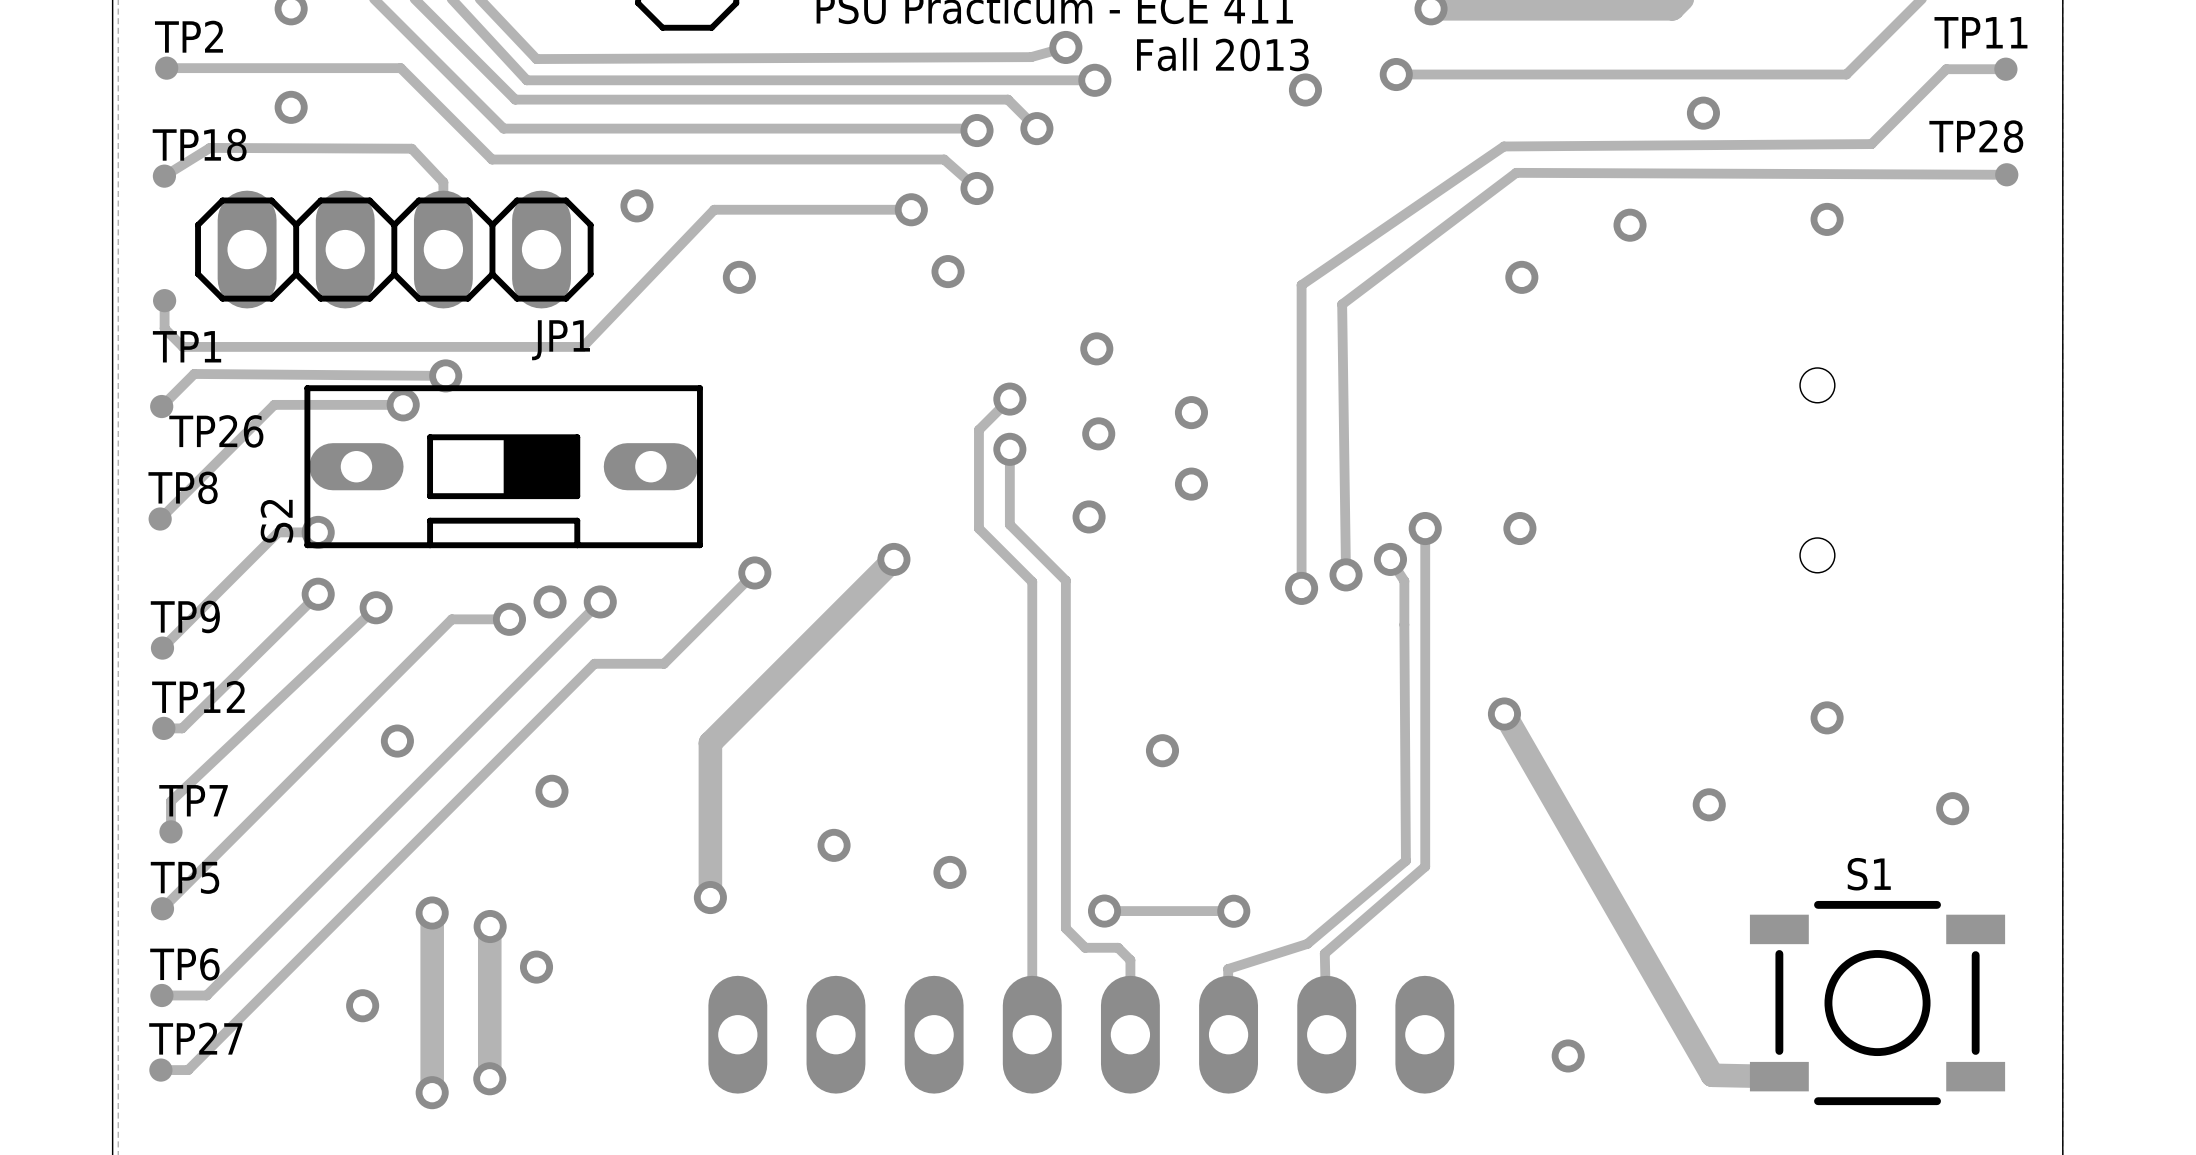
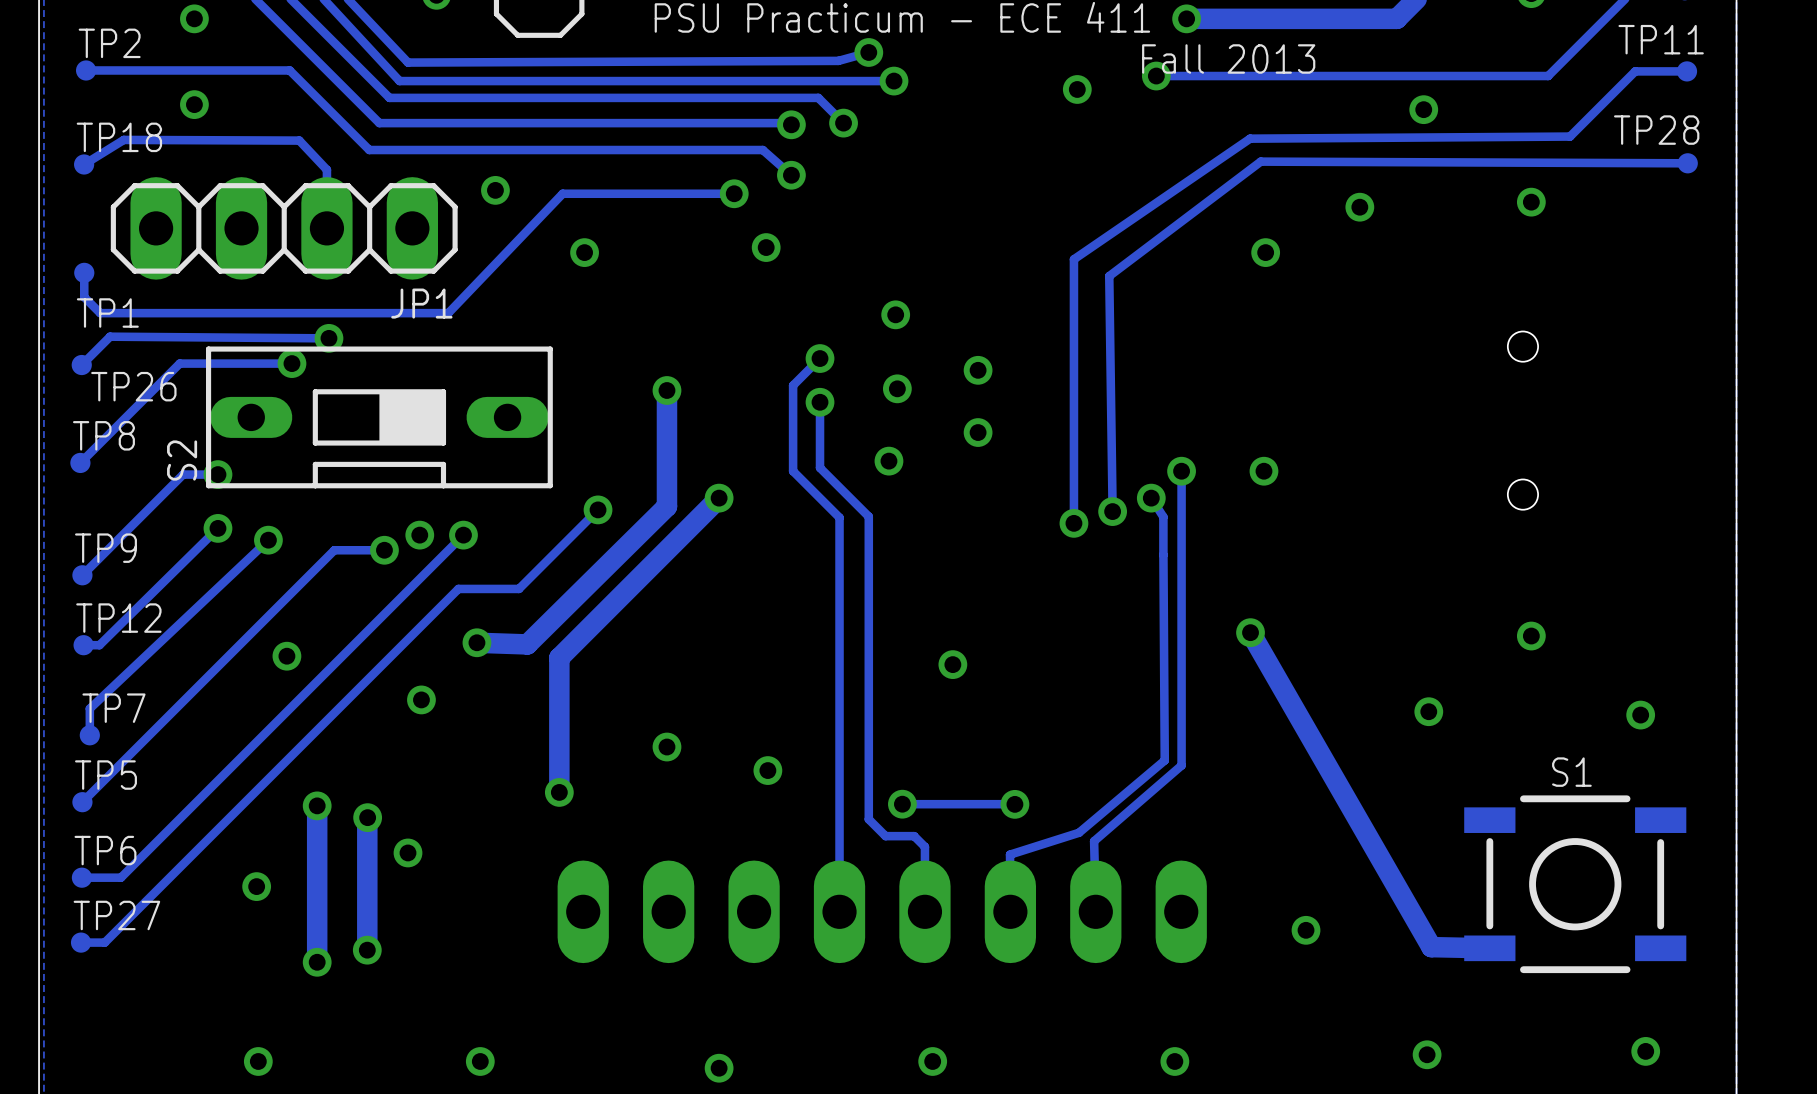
track: none -> (666, 390) (666, 506) (527, 644) (476, 642)
via: none -> (666, 390)
via: none -> (476, 642)

